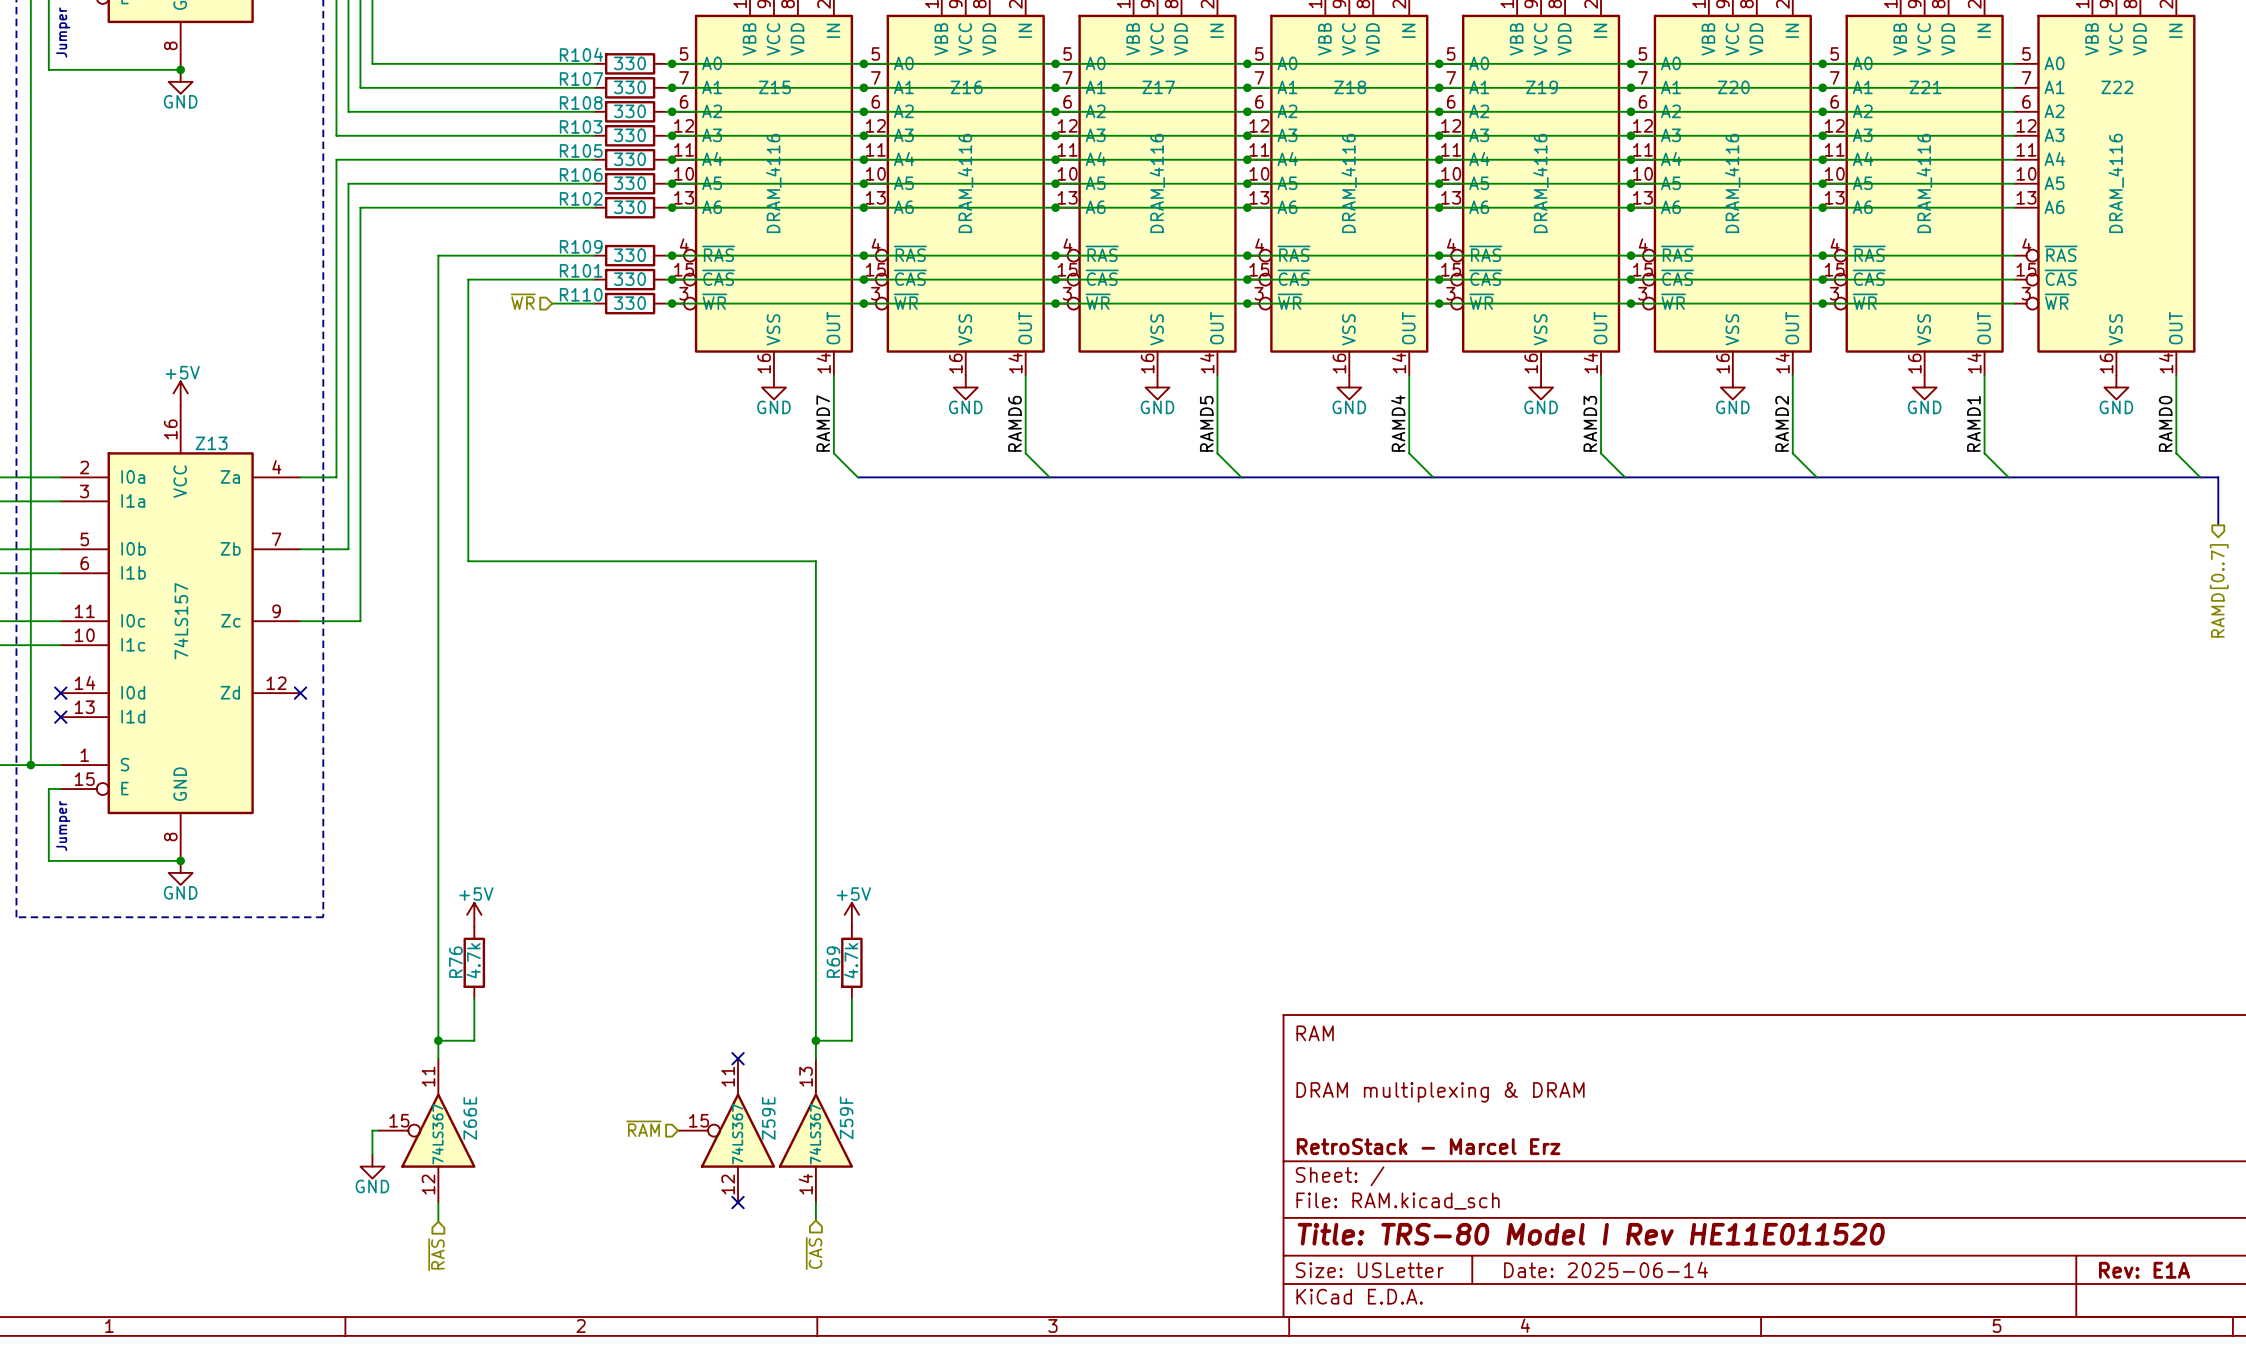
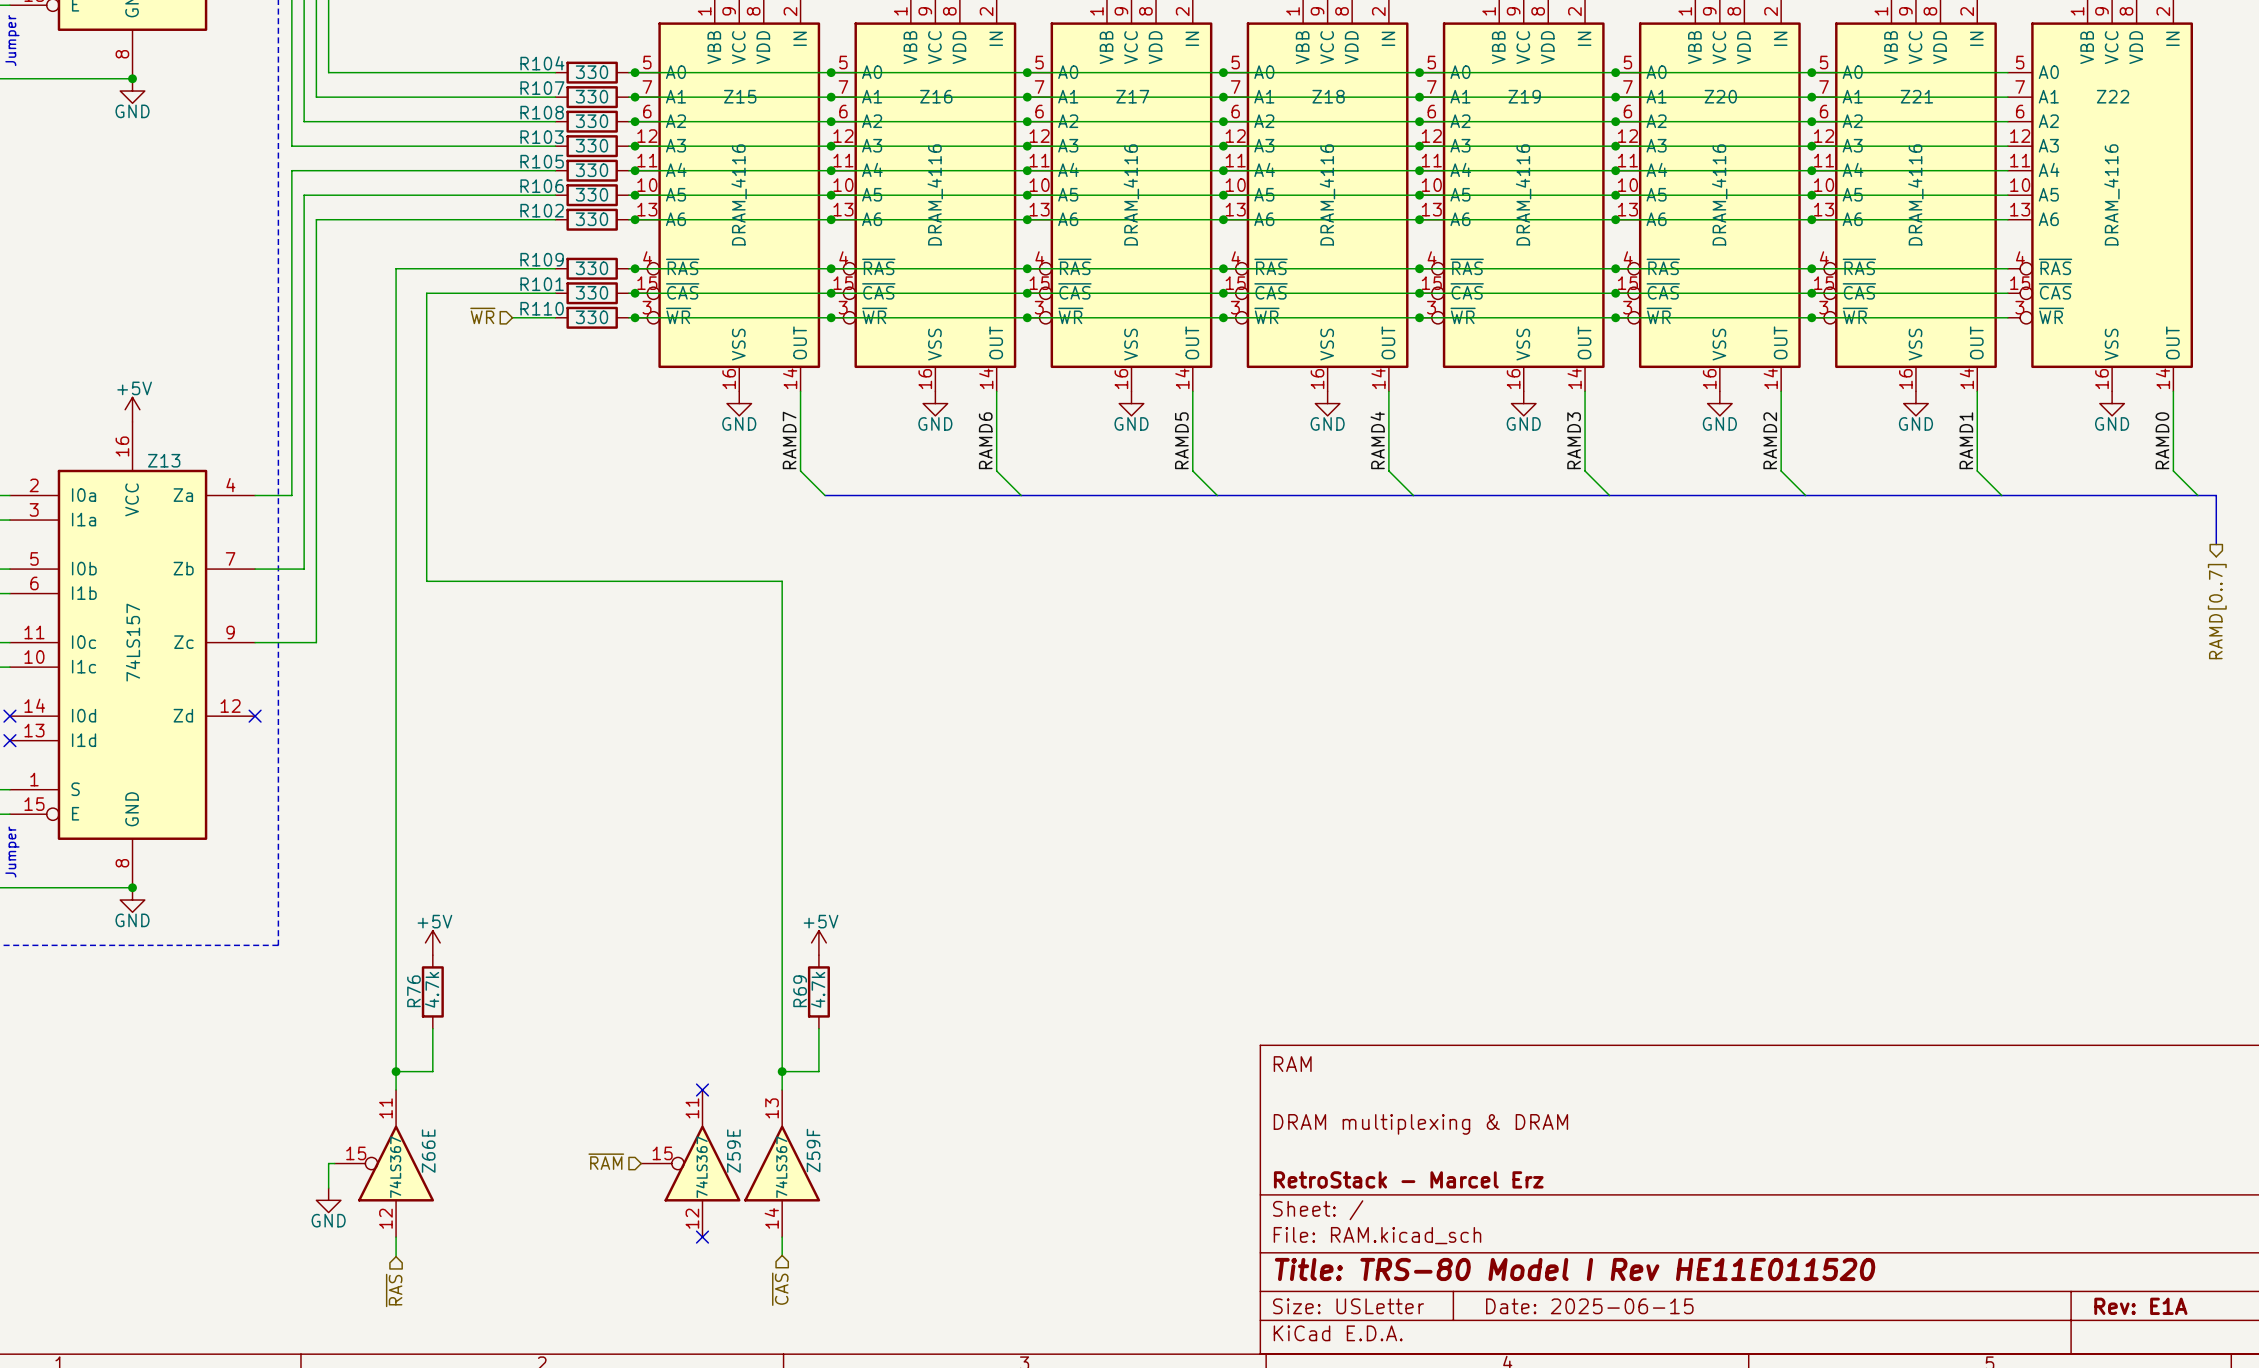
title block: Date: 2025-06-14 (1606, 1269) -> Date: 2025-06-15 (1589, 1306)

